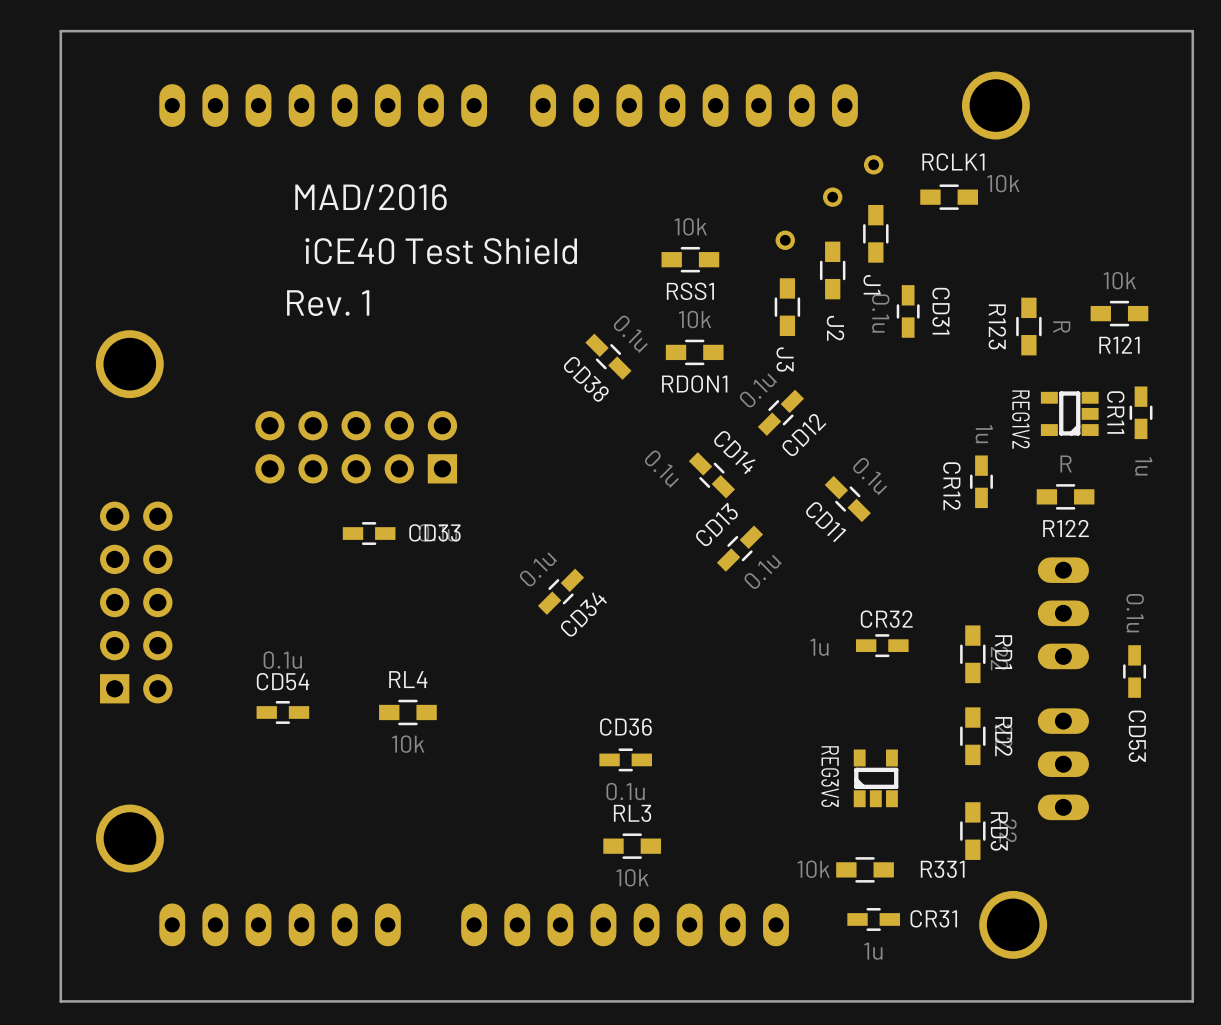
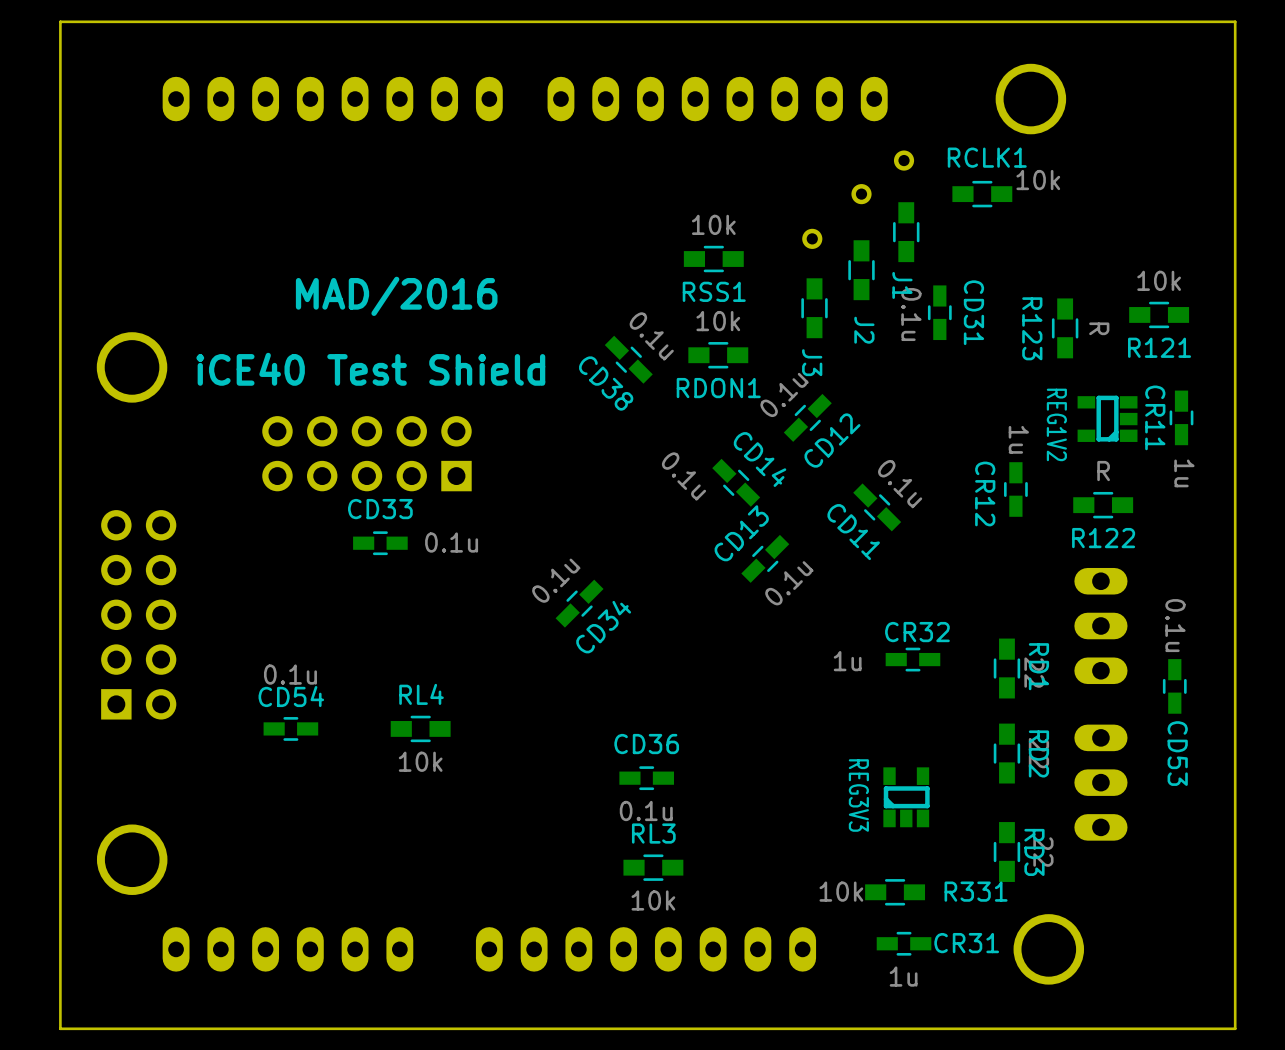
text position: MAD/2016 (371, 197) -> MAD/2016 (396, 296)
text position: iCE40 Test Shield (441, 251) -> iCE40 Test Shield (370, 369)
text: Rev. 1 (328, 303) -> none
CD33 name position: CD33 (434, 532) -> CD33 (380, 509)

